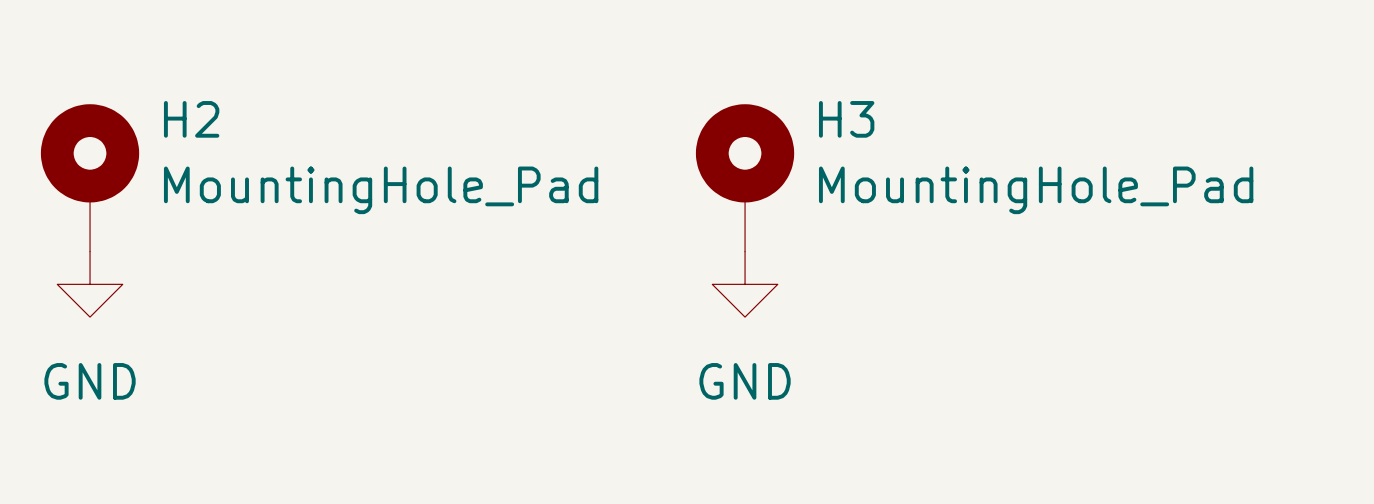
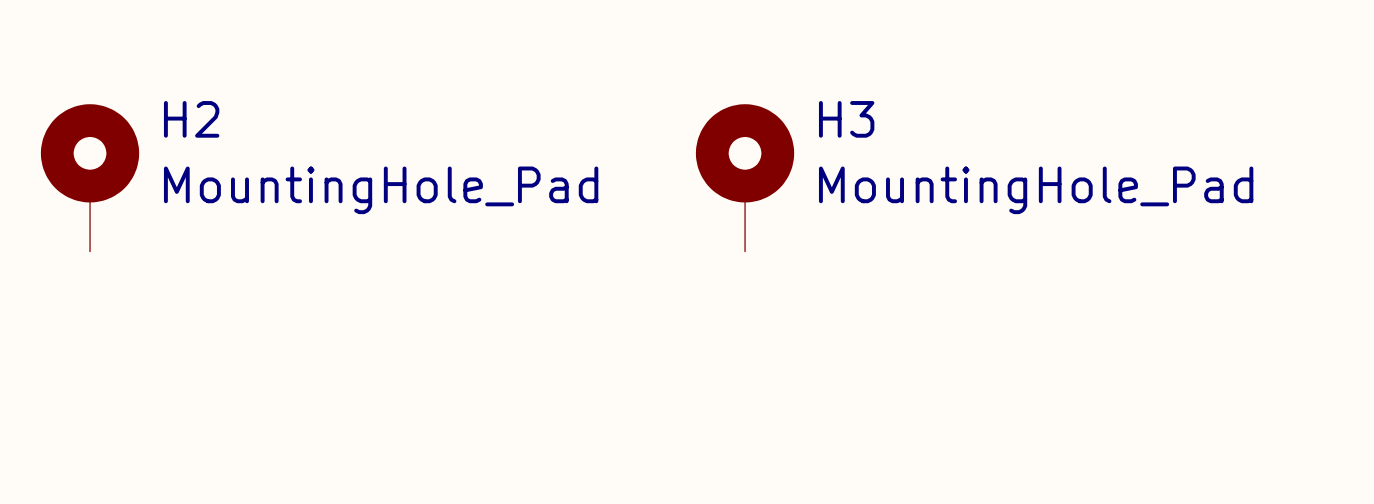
power symbol: GND (90, 284) -> none
power symbol: GND (745, 284) -> none

